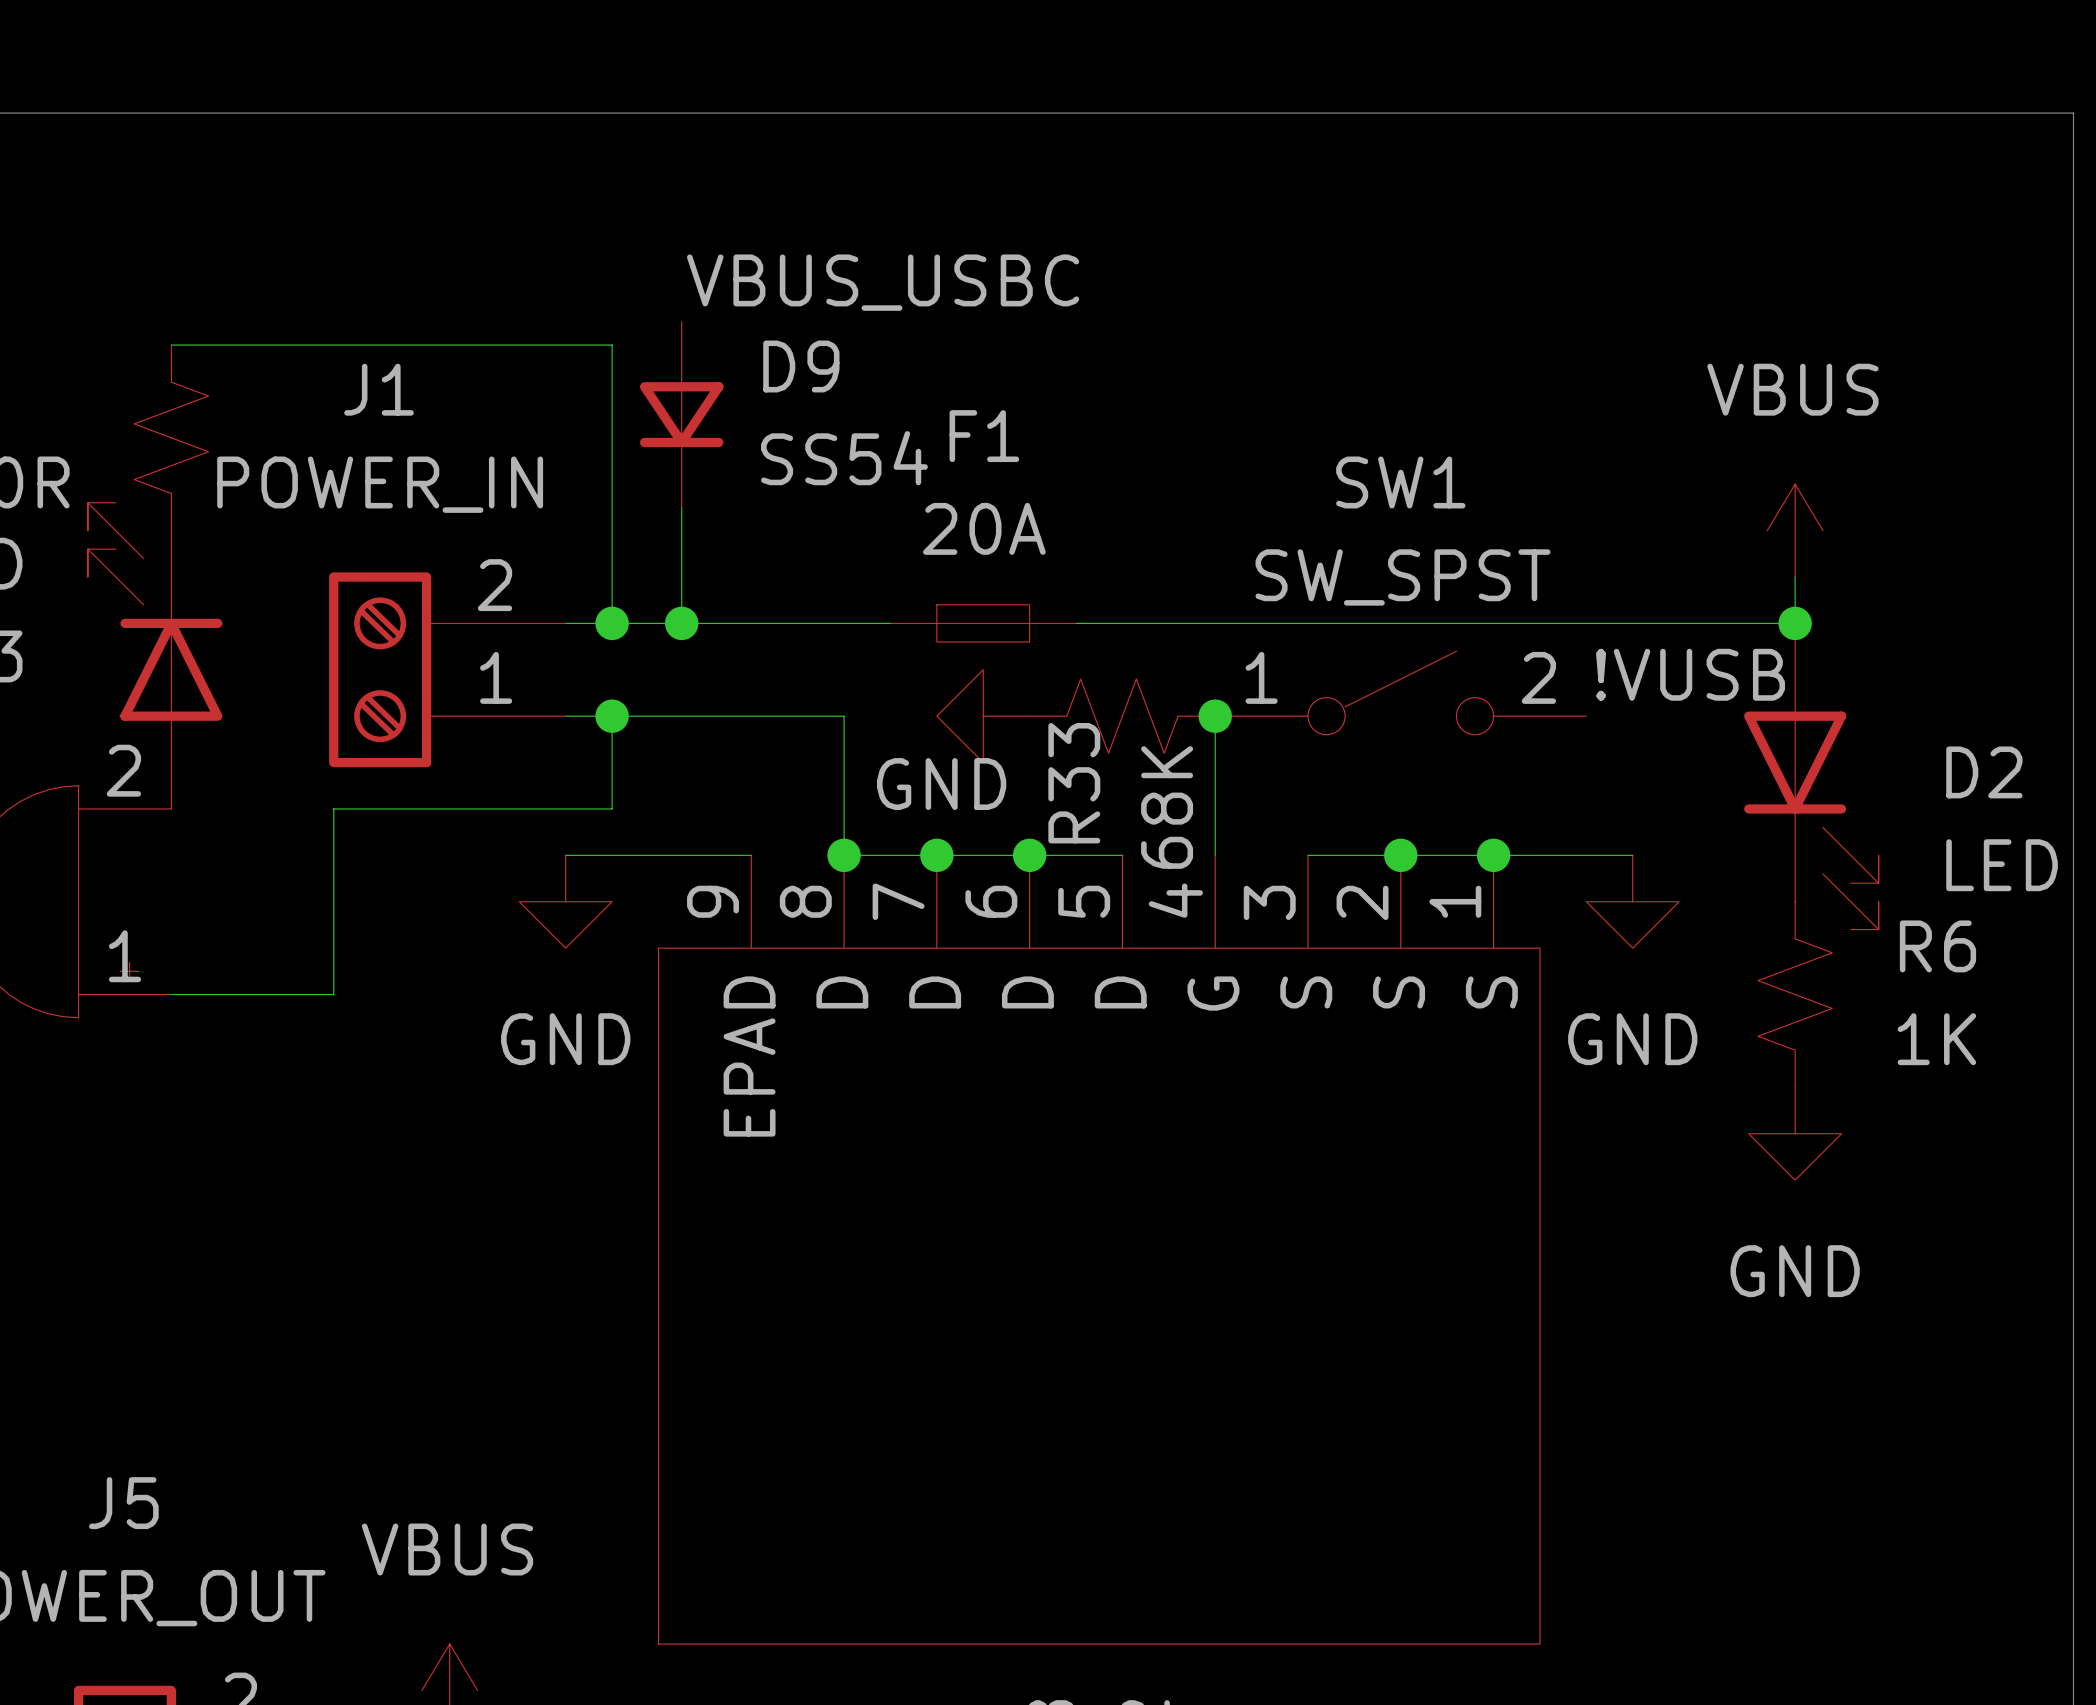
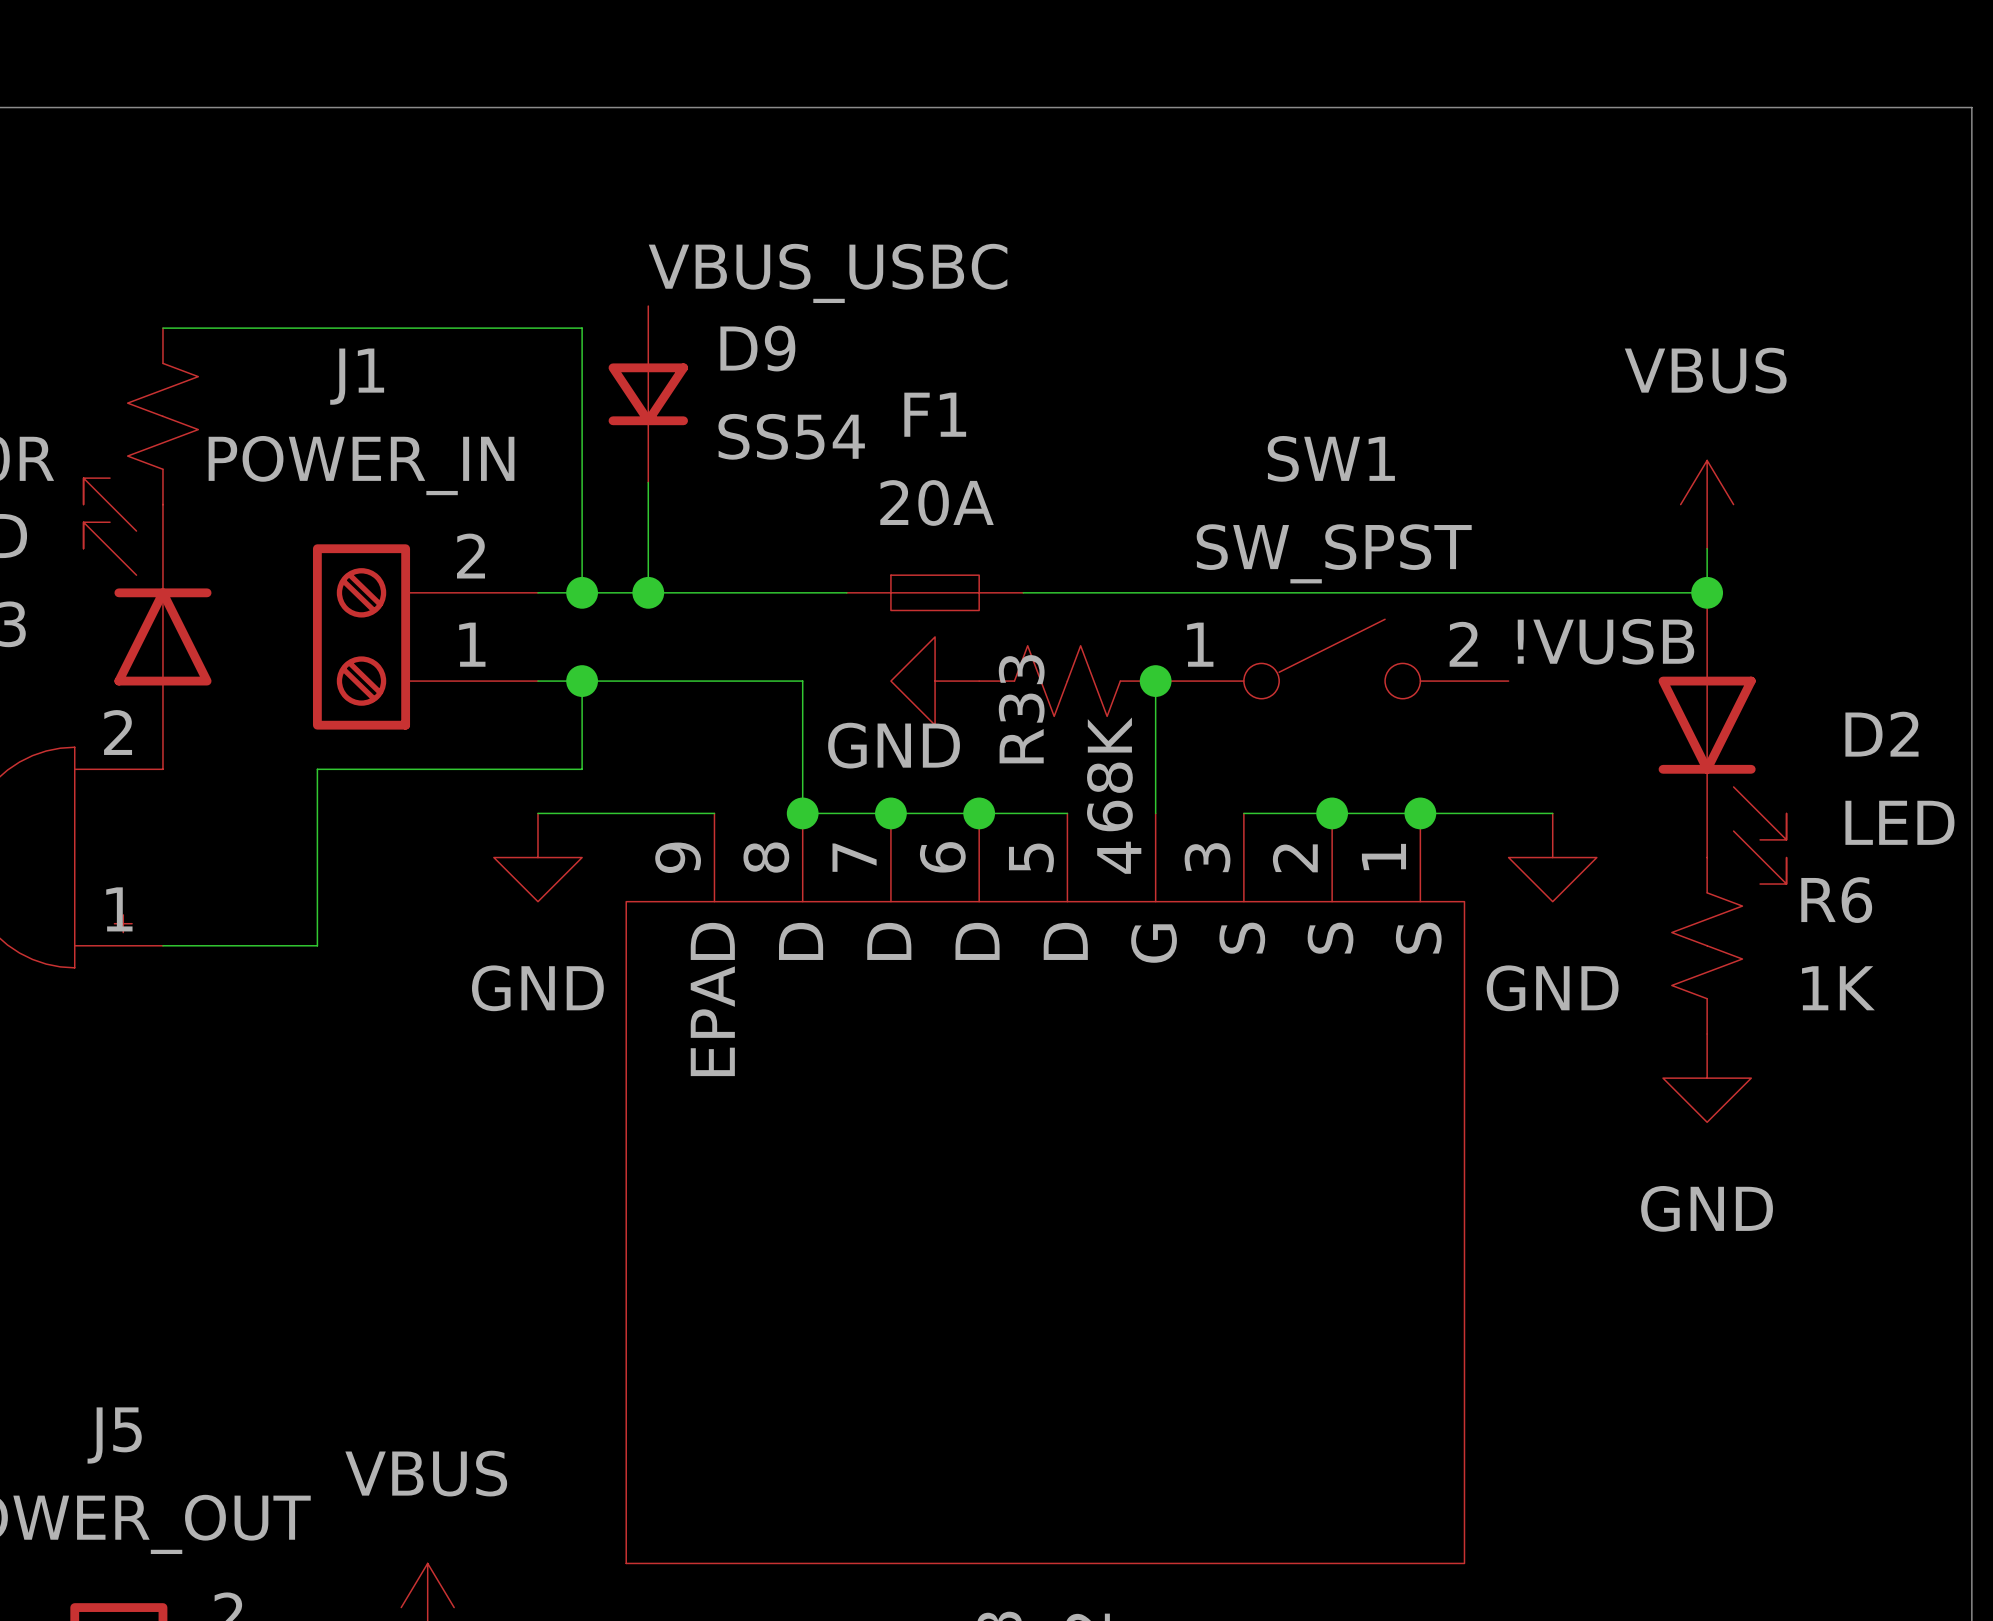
R33 name position: R33 (1074, 783) -> R33 (1021, 709)

